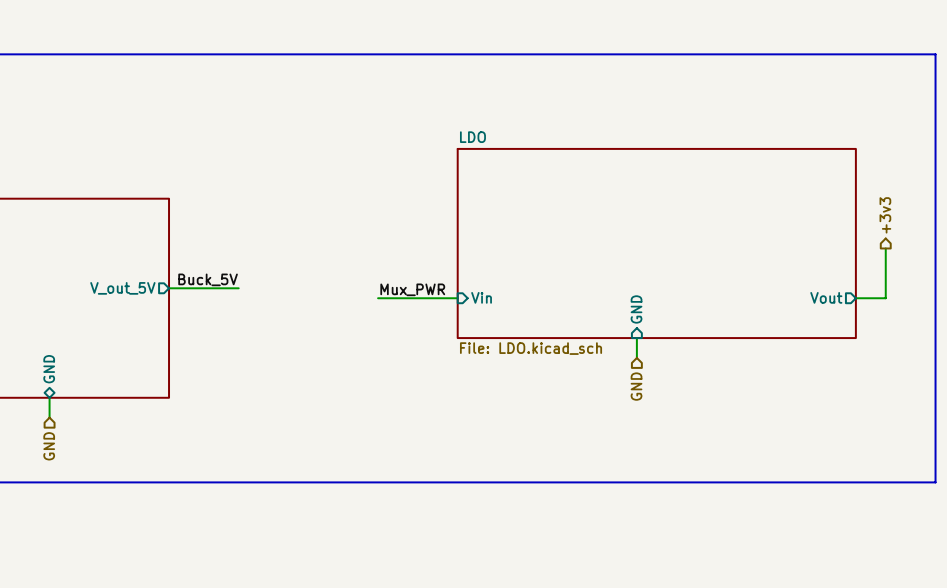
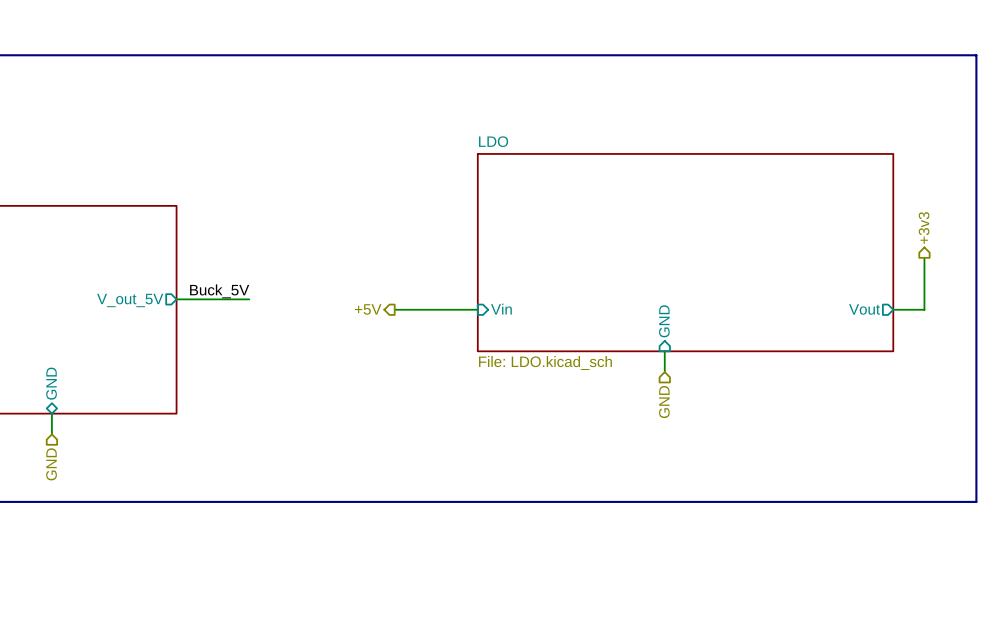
label: Mux_PWR (412, 289) -> none
hierarchical label: none -> +5V (368, 309)

